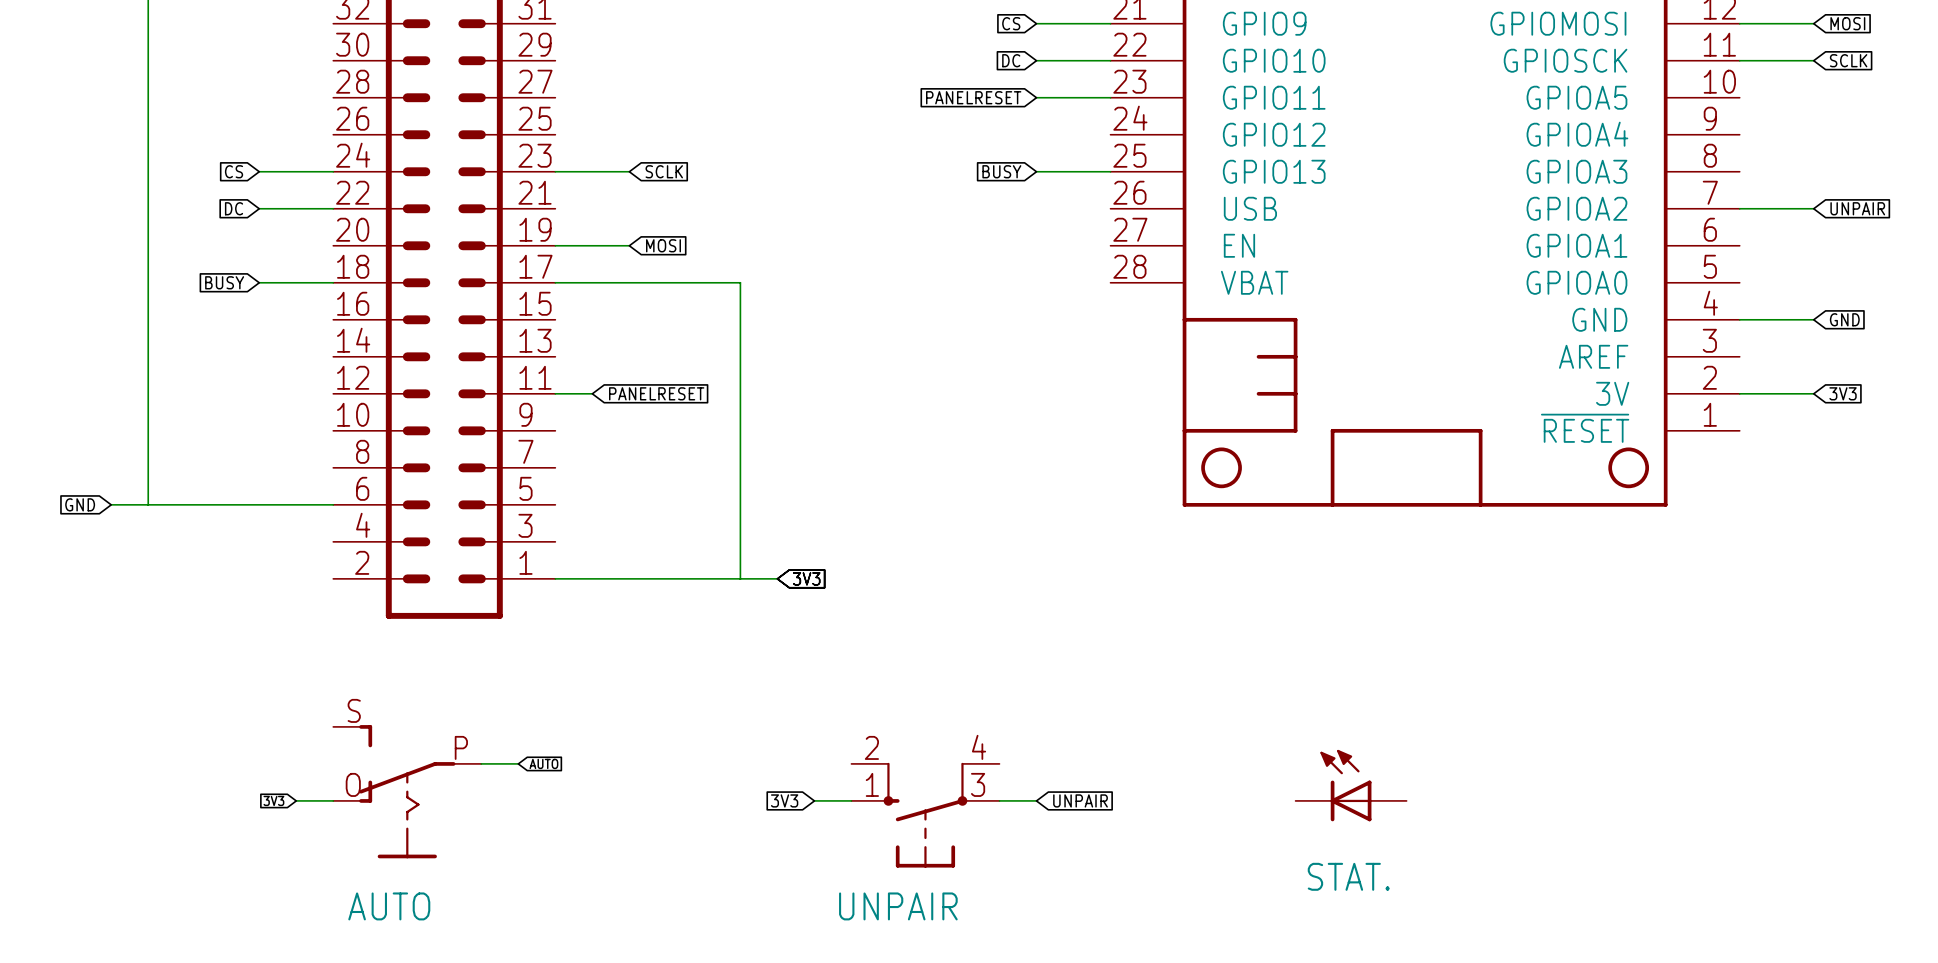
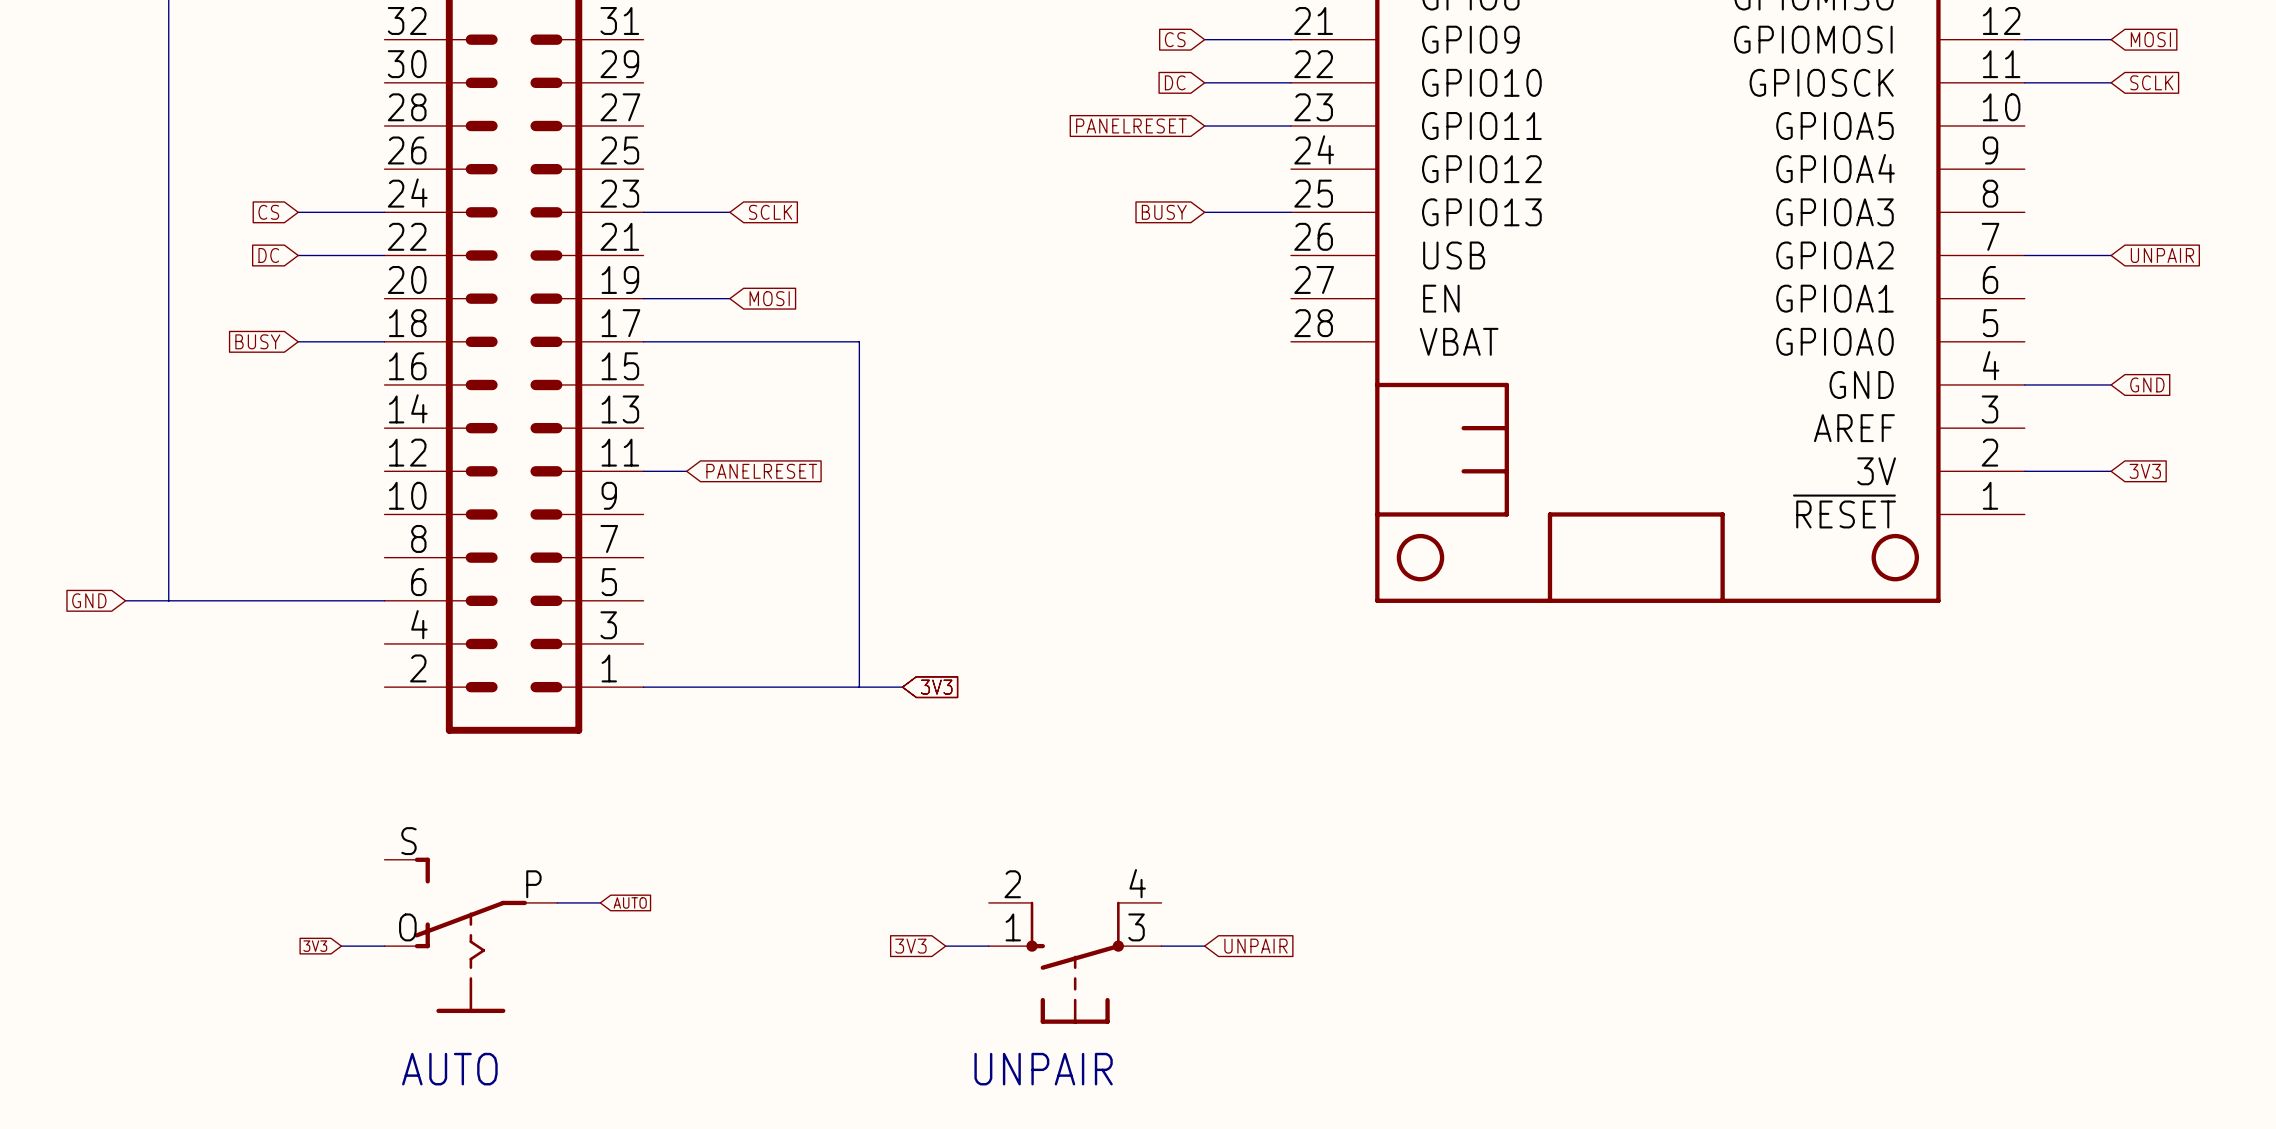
STAT.: (1351, 785) -> none

